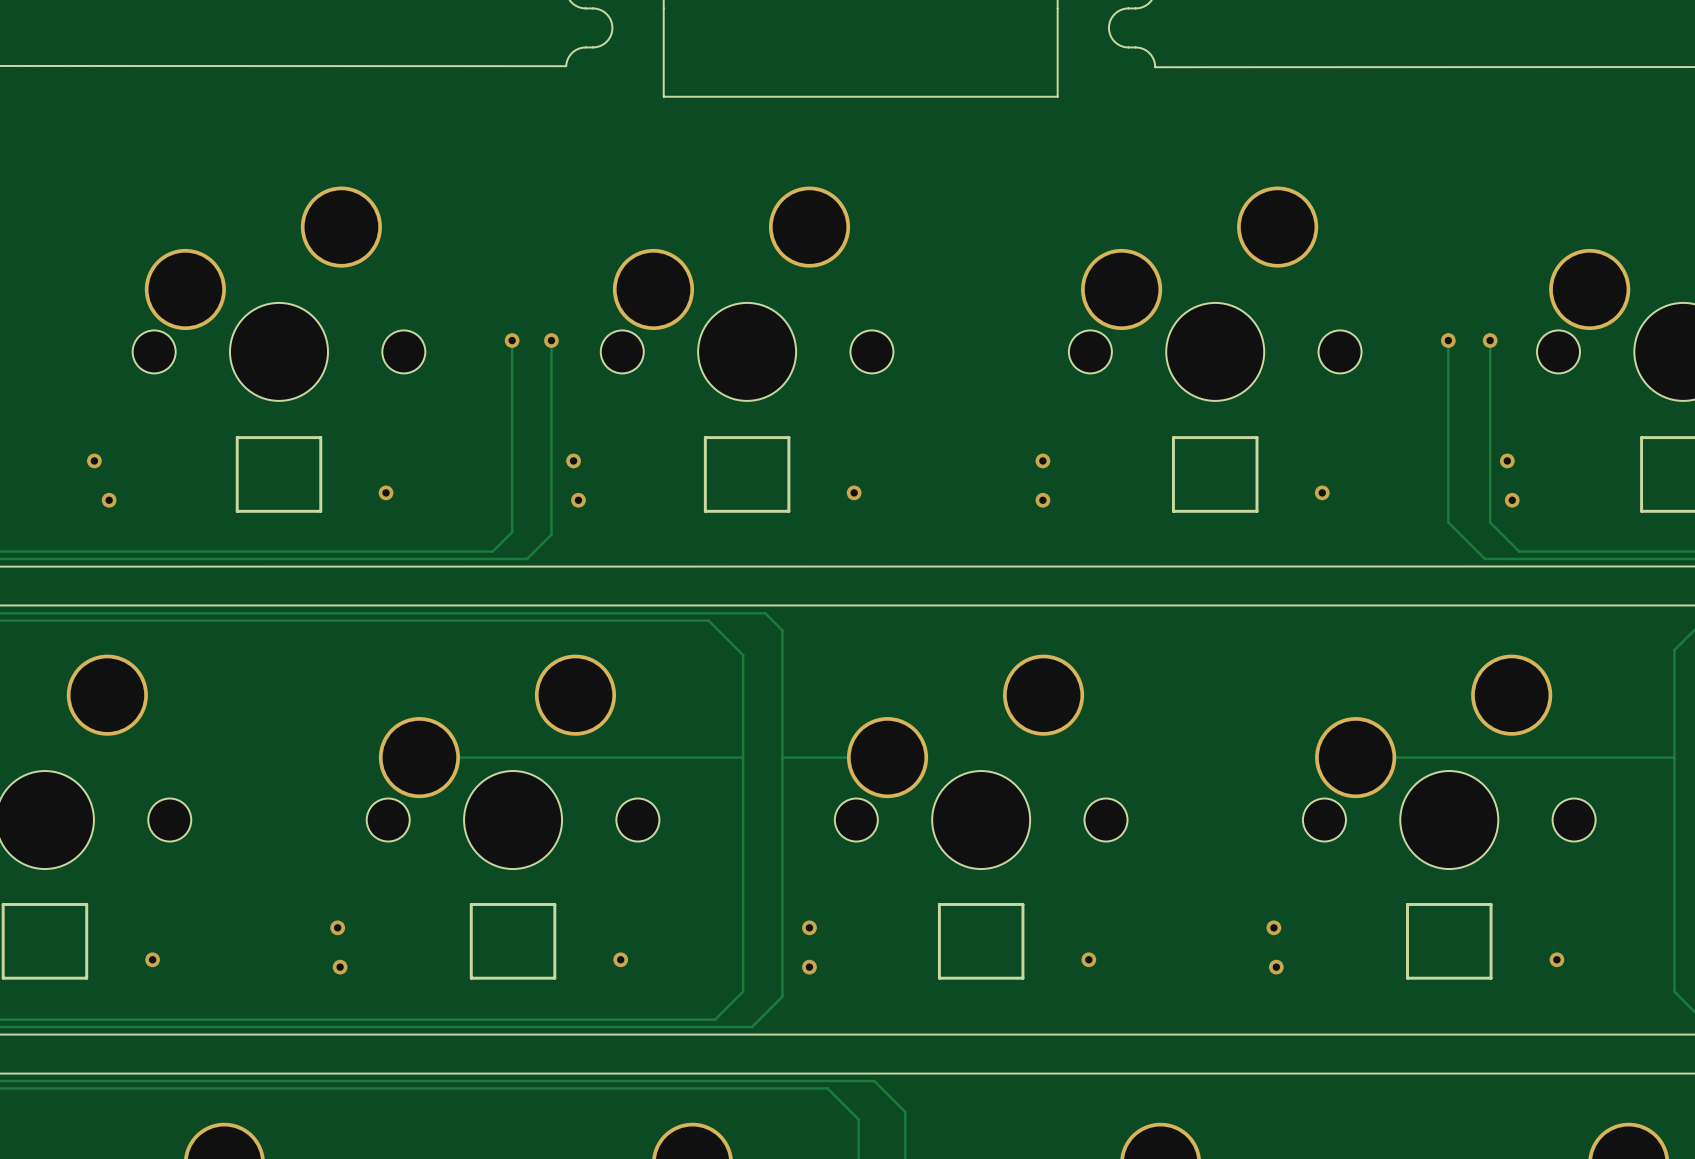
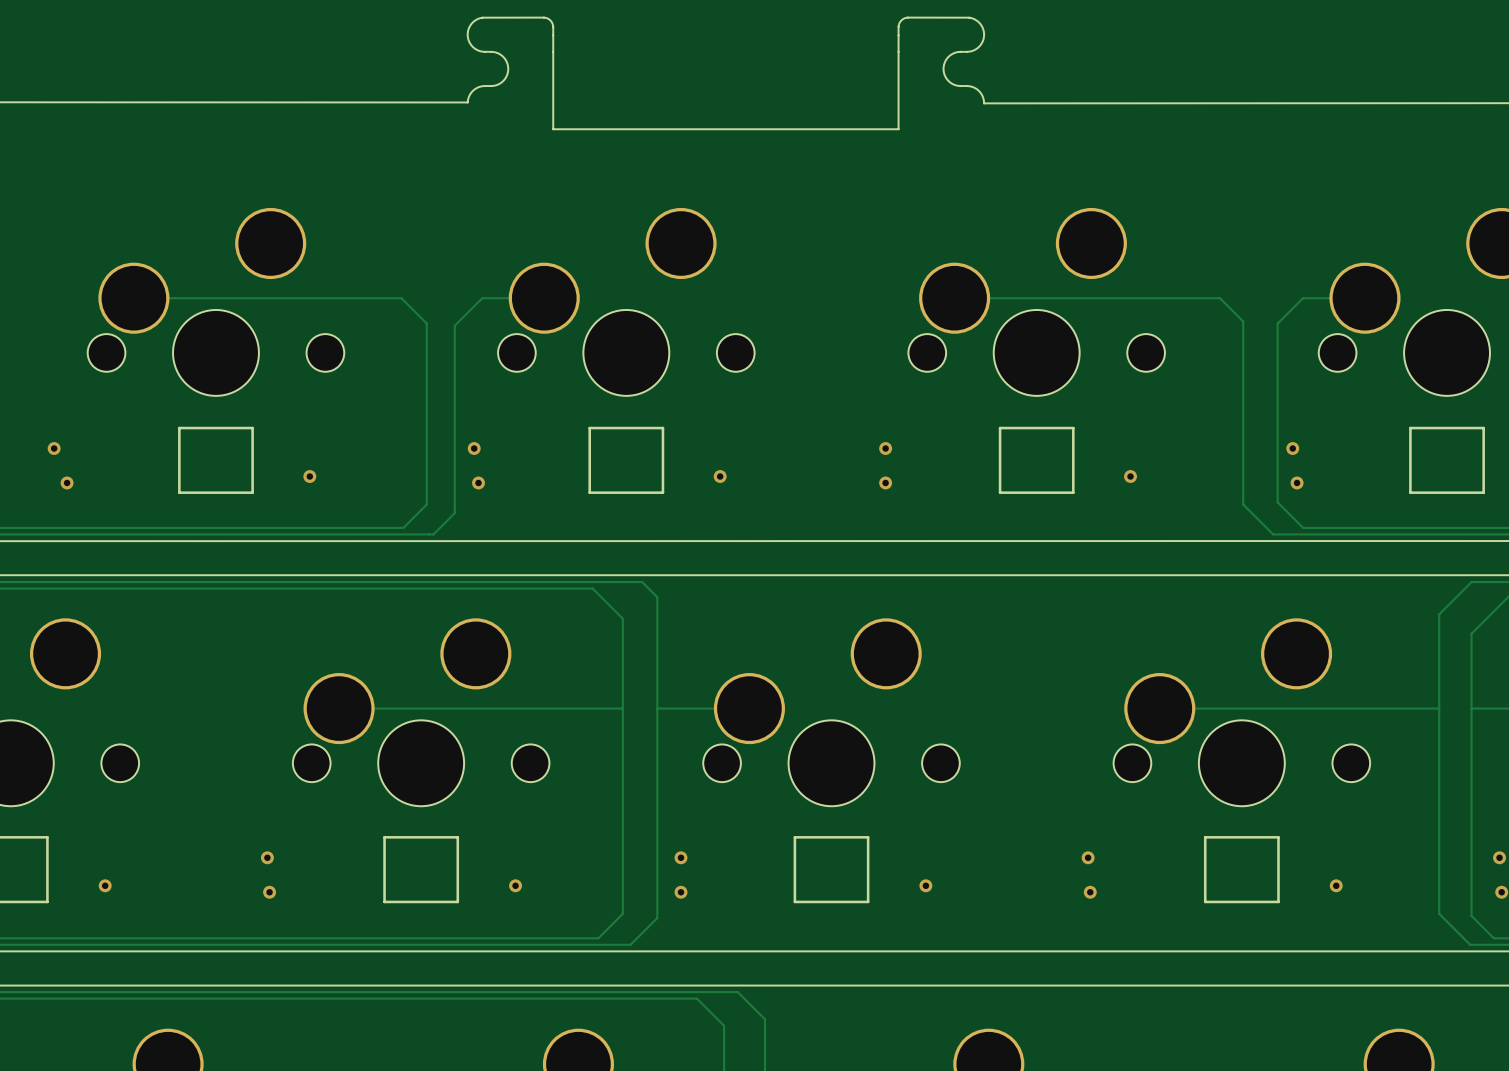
track: none -> (544, 298) (482, 298) (454, 325) (454, 342)
track: none -> (1364, 298) (1303, 298) (1277, 323) (1277, 342)
track: (512, 340) (512, 532) -> (133, 298) (401, 298) (426, 323) (426, 504) (420, 510)
via: (512, 340) -> none
via: (551, 340) -> none
track: (1448, 340) (1448, 522) (1450, 524) -> (954, 298) (1220, 298) (1243, 321) (1243, 504)
via: (1448, 340) -> none
via: (1490, 340) -> none

